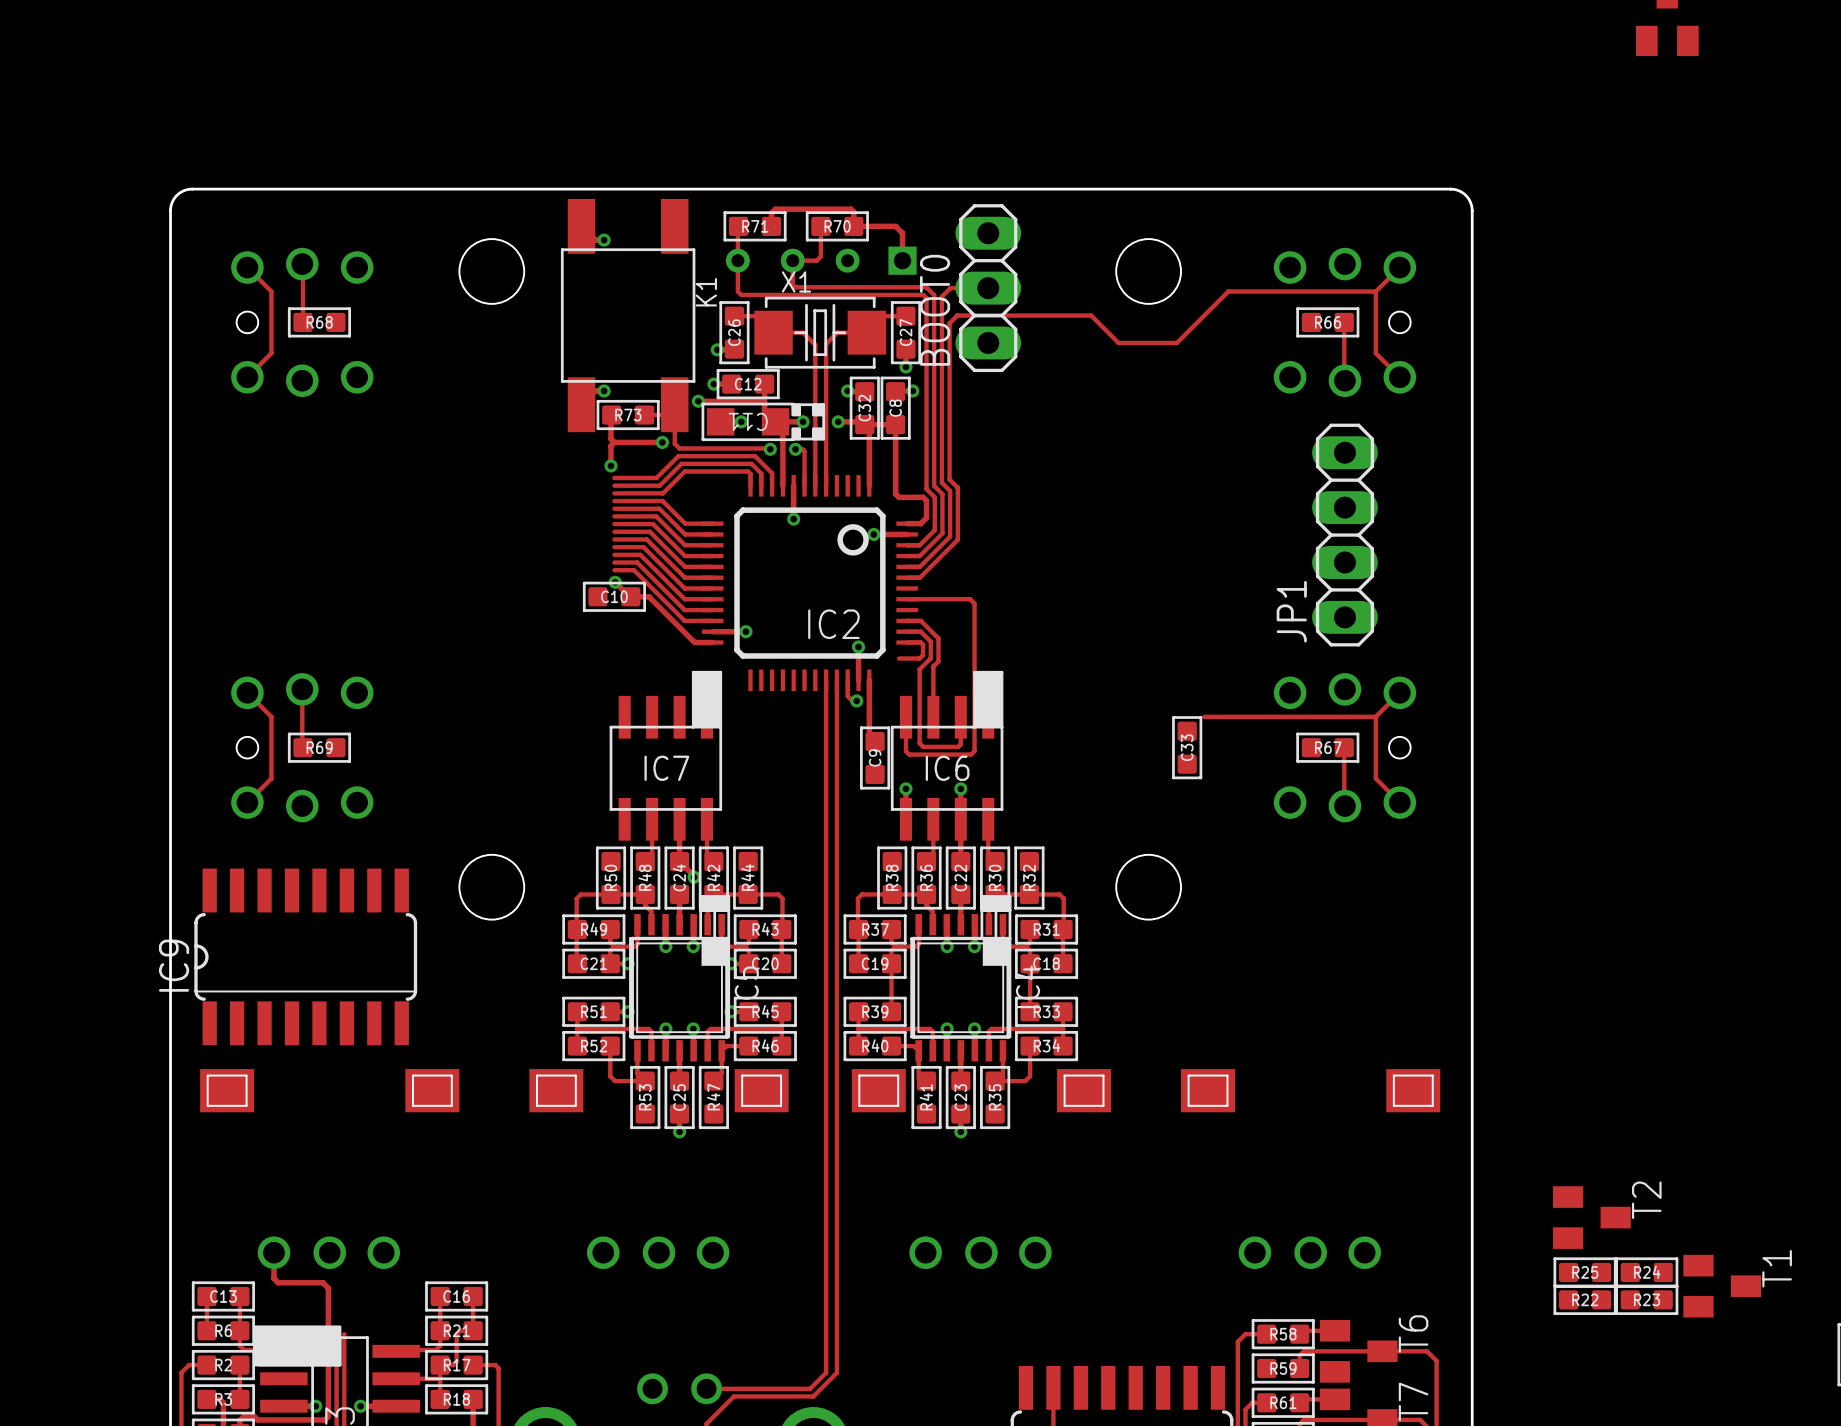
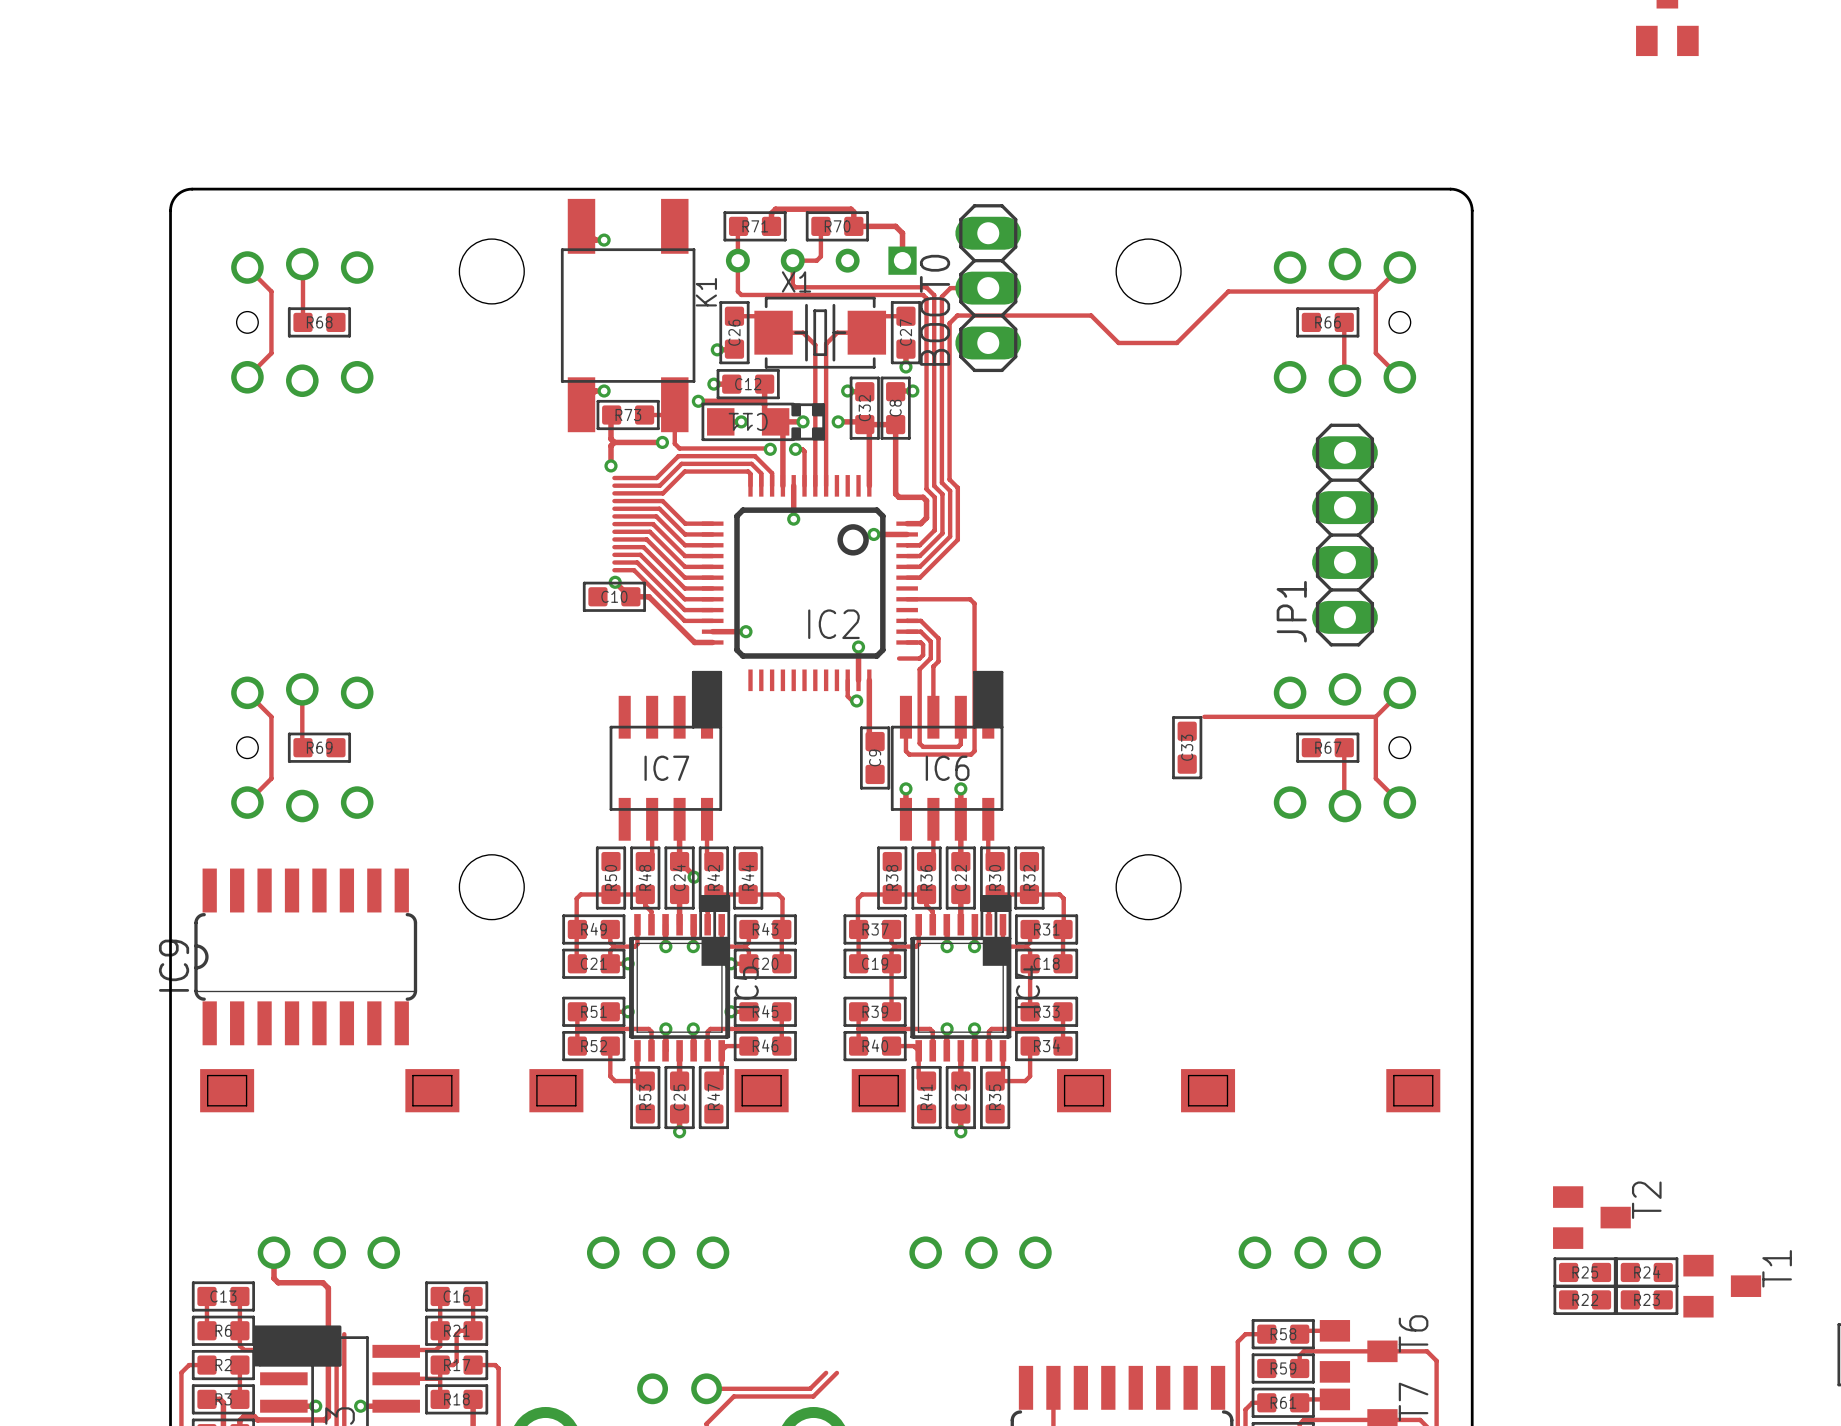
track: (826, 680) (826, 1372) -> none
track: (836, 680) (836, 1372) -> none

